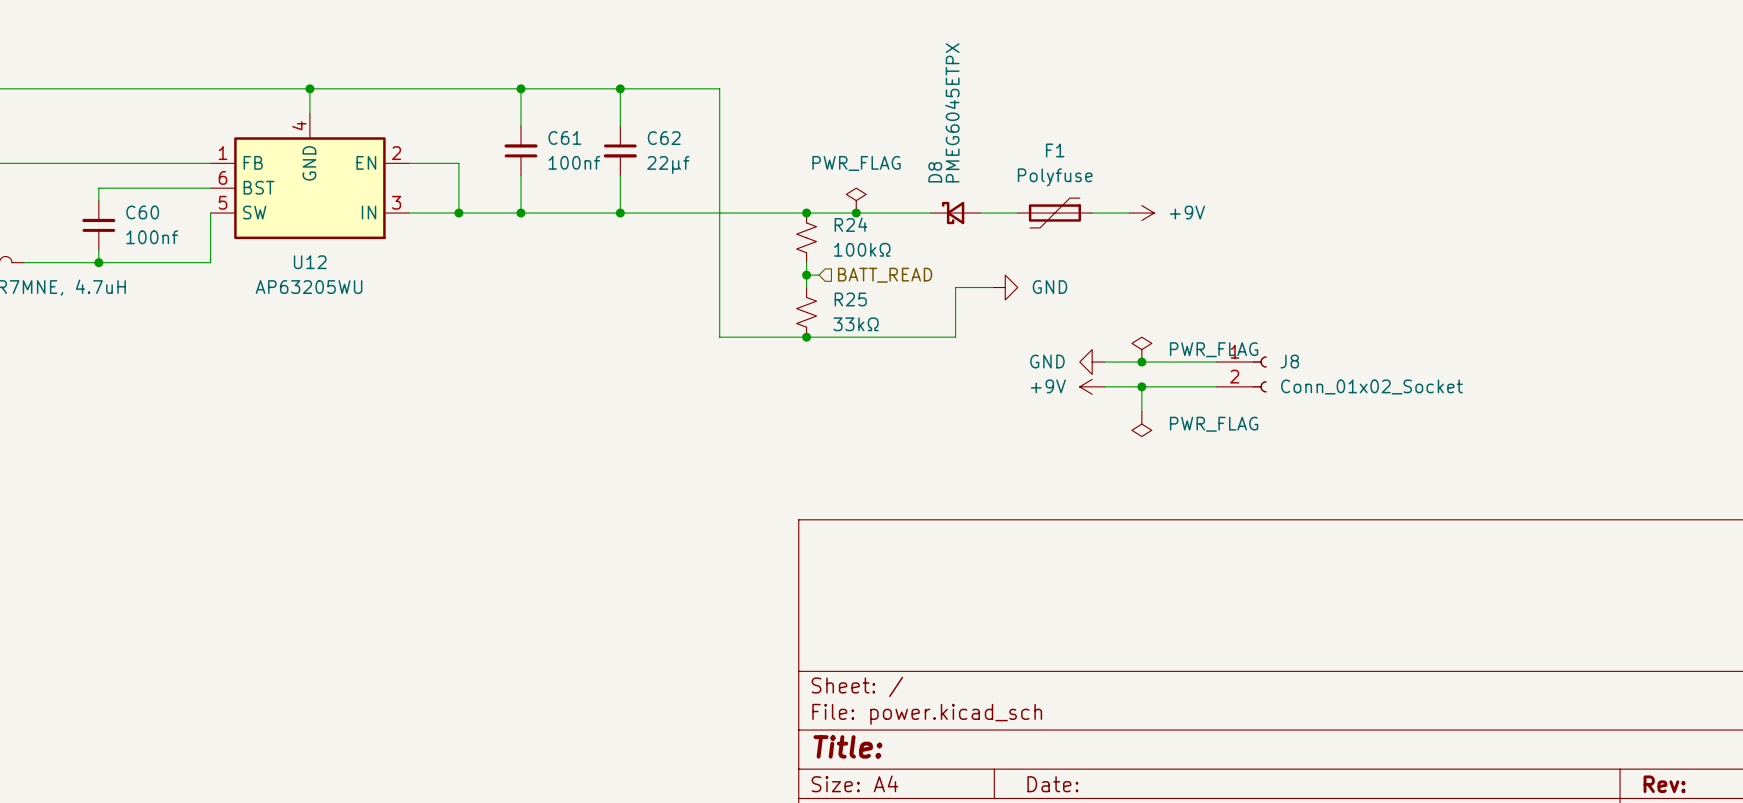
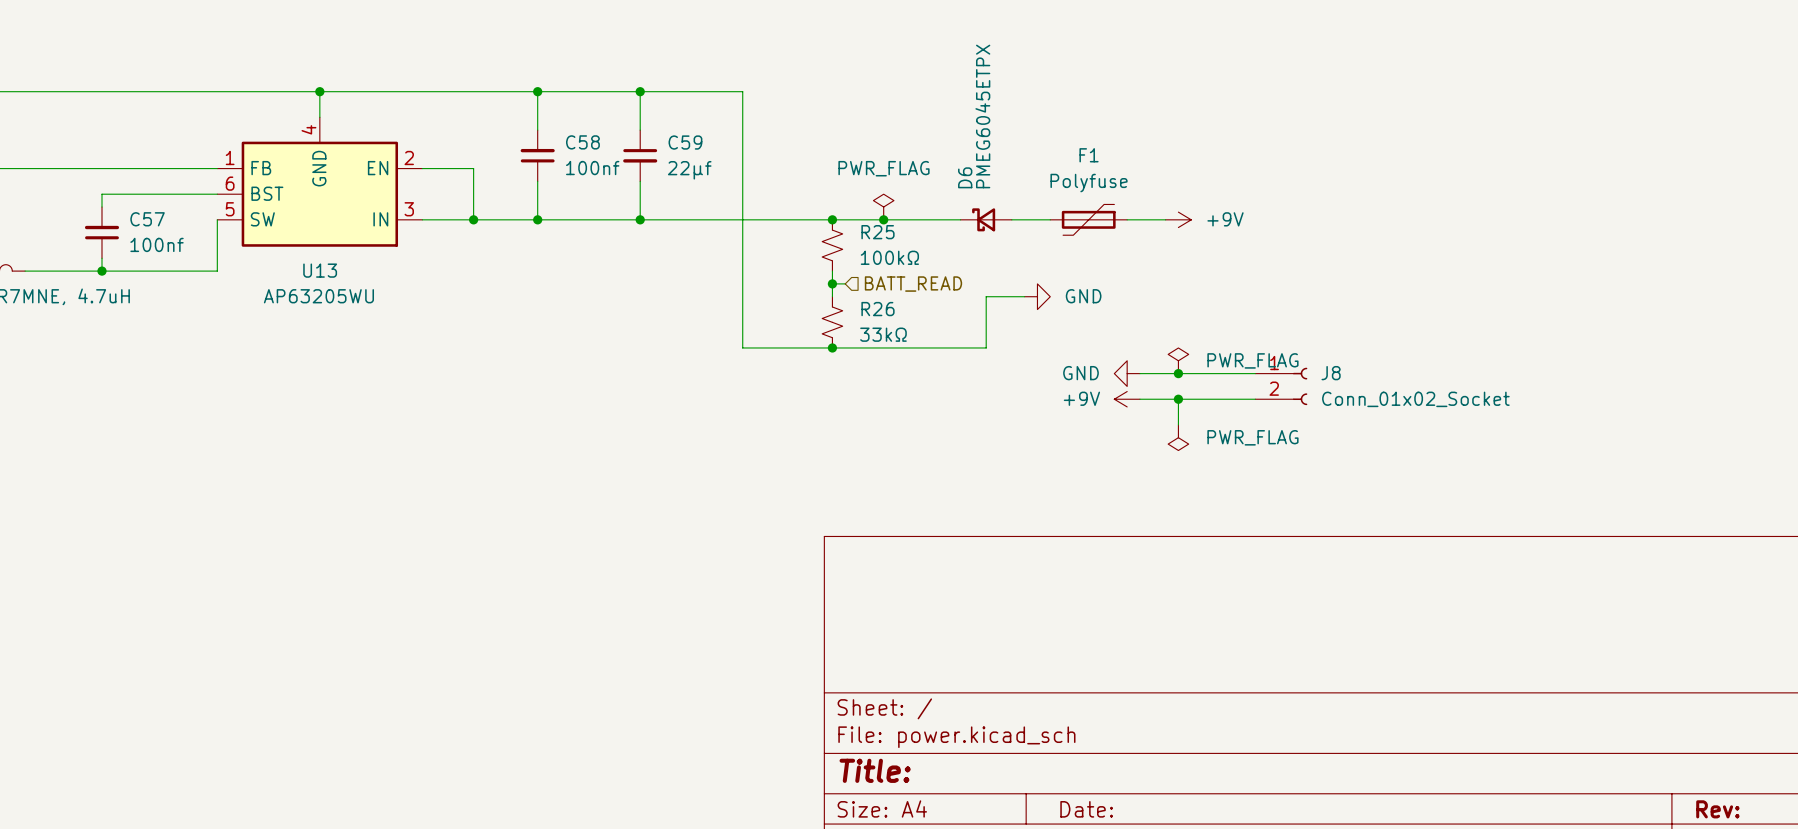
C61 name: C61 (564, 137) -> C58 (582, 142)
C62 name: C62 (664, 138) -> C59 (685, 142)
D8 name: D8 (935, 172) -> D6 (965, 177)
C60 name: C60 (142, 212) -> C57 (147, 219)
R24 name: R24 (851, 224) -> R25 (877, 232)
U12 name: U12 (310, 262) -> U13 (320, 270)
R25 name: R25 (850, 299) -> R26 (877, 309)

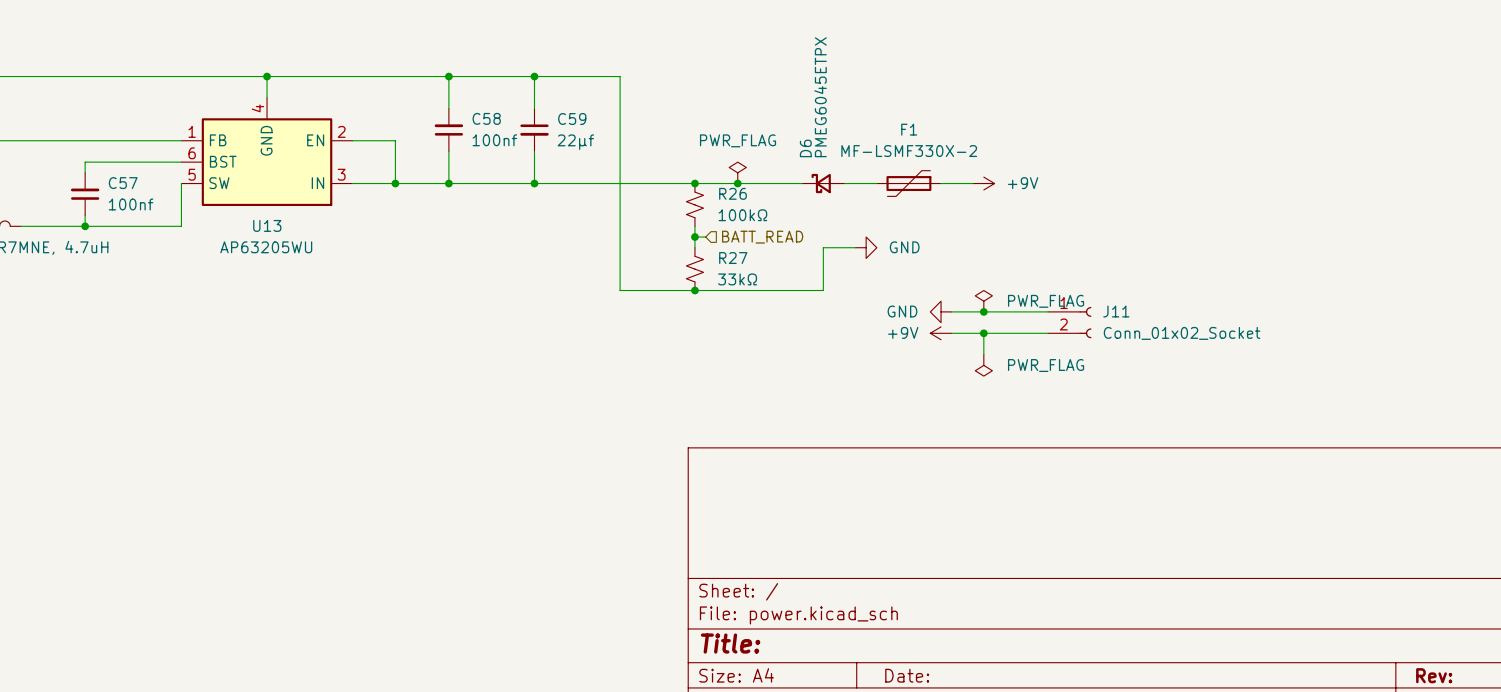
F1 value: Polyfuse (1089, 183) -> MF-LSMF330X-2 (909, 151)
R25 name: R25 (877, 232) -> R26 (733, 193)
R26 name: R26 (877, 309) -> R27 (733, 258)
J8 name: J8 (1331, 373) -> J11 (1116, 311)

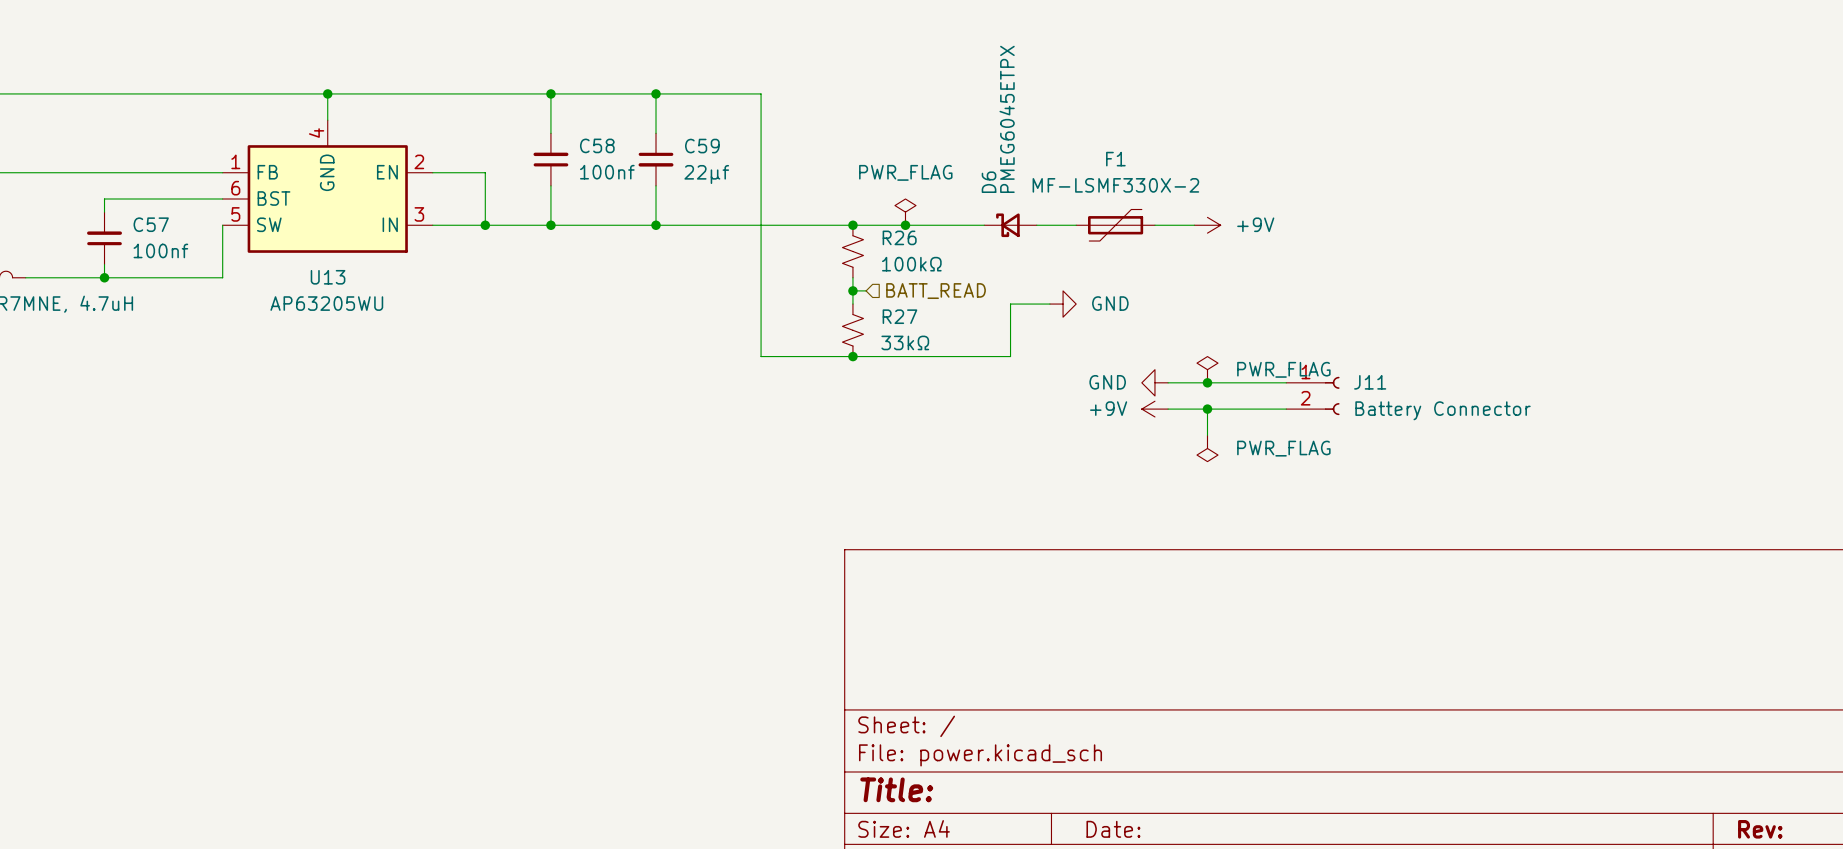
J11 value: Conn_01x02_Socket (1182, 333) -> Battery Connector (1443, 410)

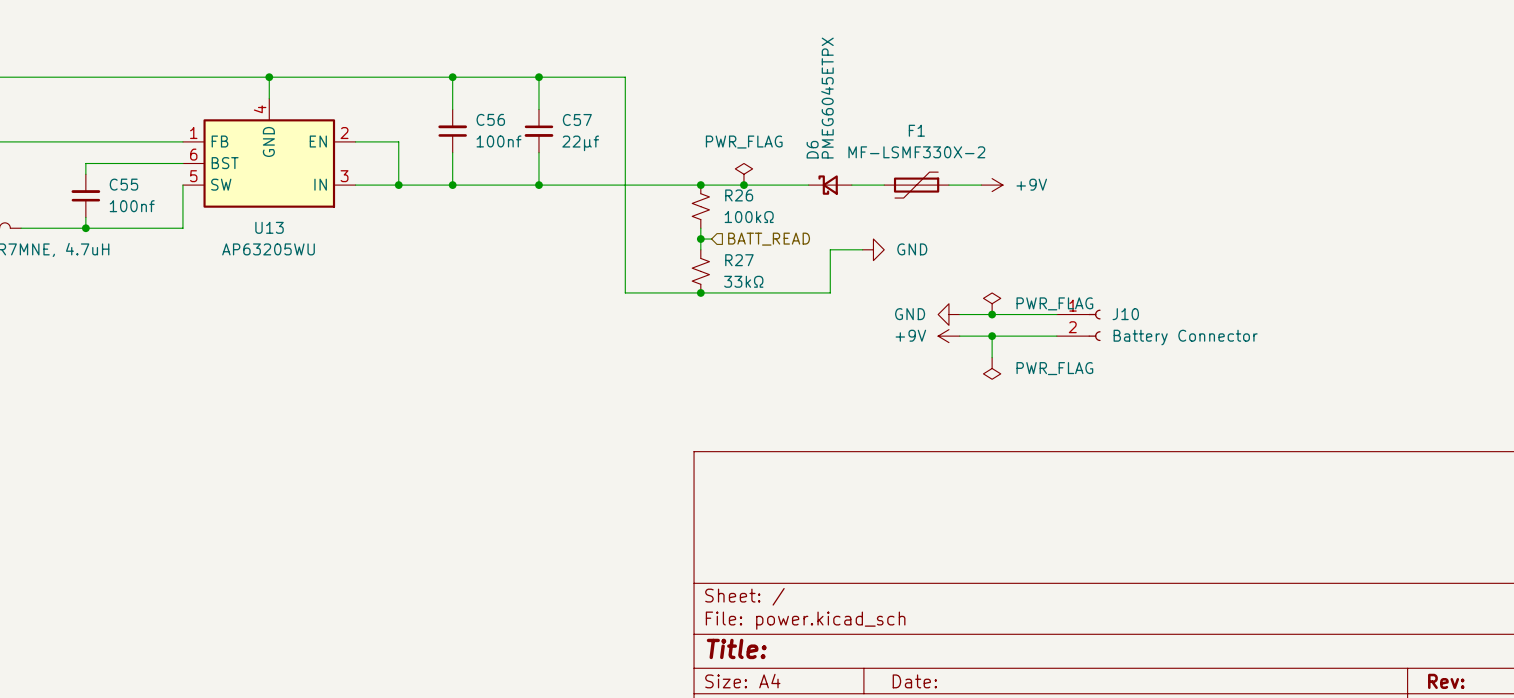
C58 name: C58 (597, 145) -> C56 (490, 119)
C59 name: C59 (702, 146) -> C57 (577, 119)
C57 name: C57 (151, 224) -> C55 (123, 184)
J11 name: J11 (1370, 382) -> J10 (1125, 314)

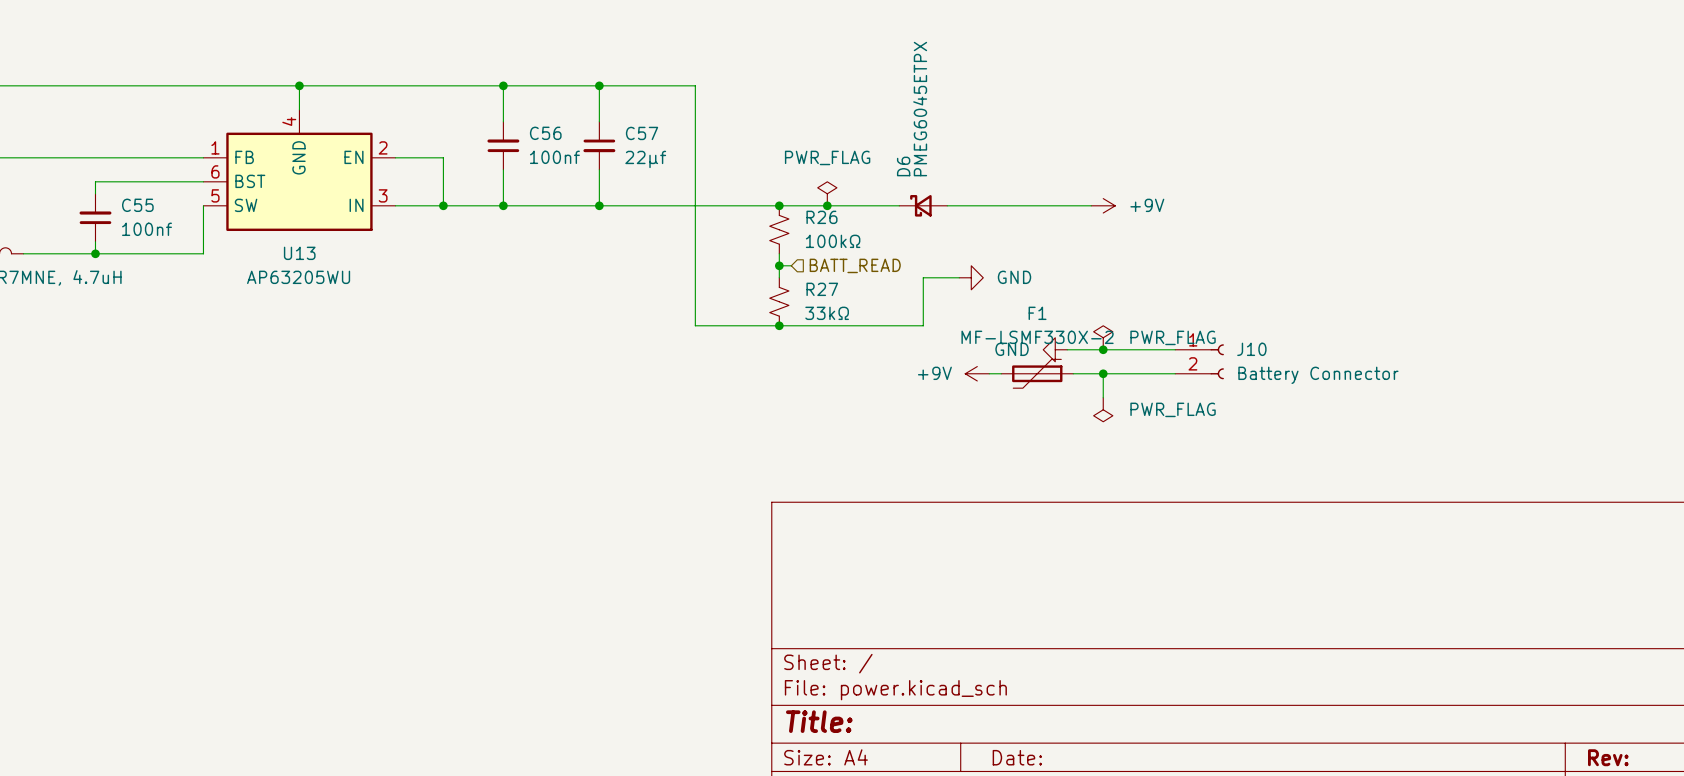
F1 position: (916, 185) -> (1037, 373)
wire: none -> (989, 373) (1001, 373)
power symbol position: +9V (948, 336) -> +9V (977, 373)

